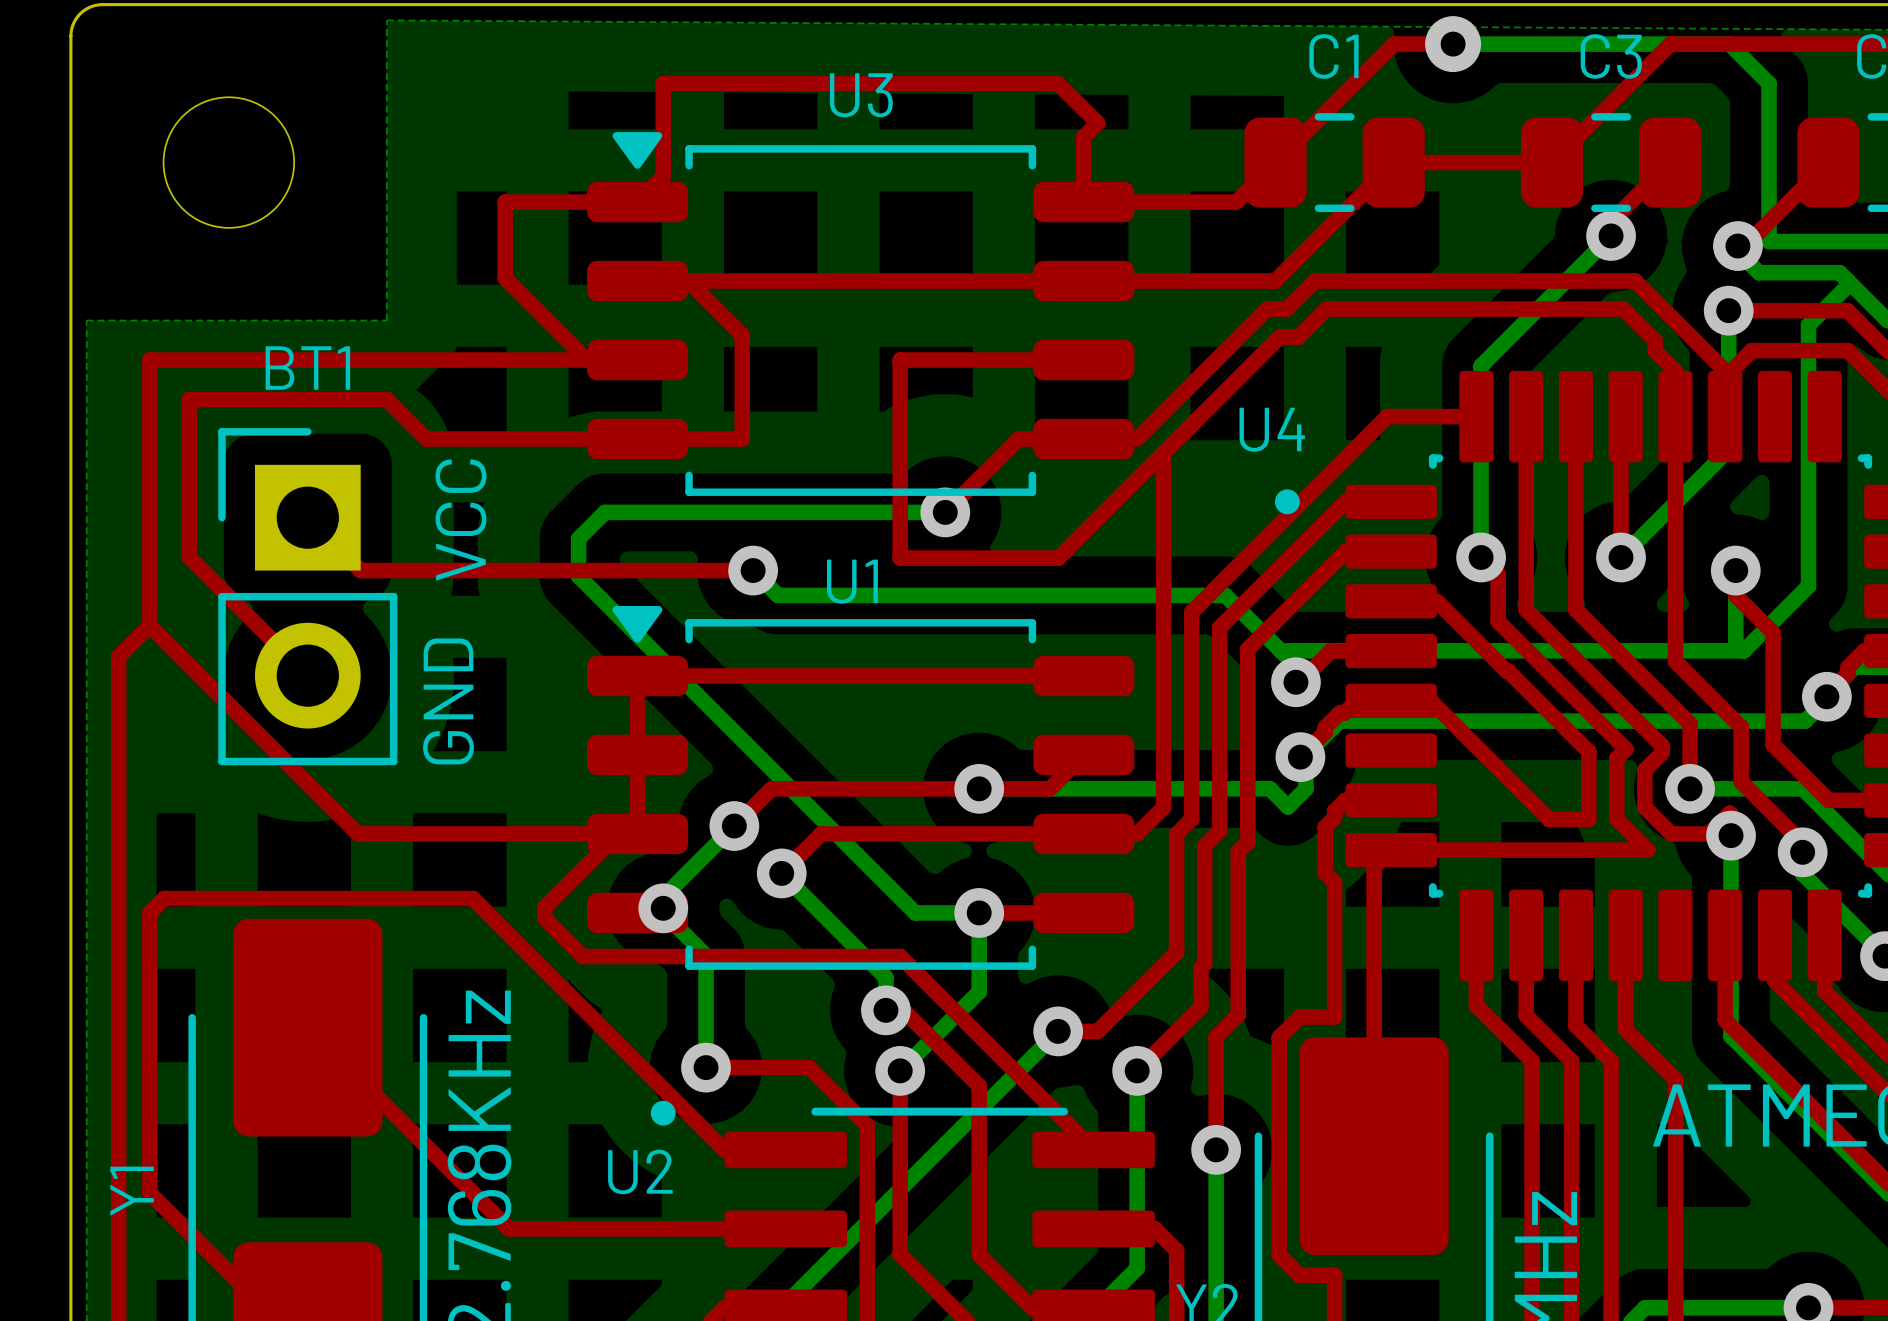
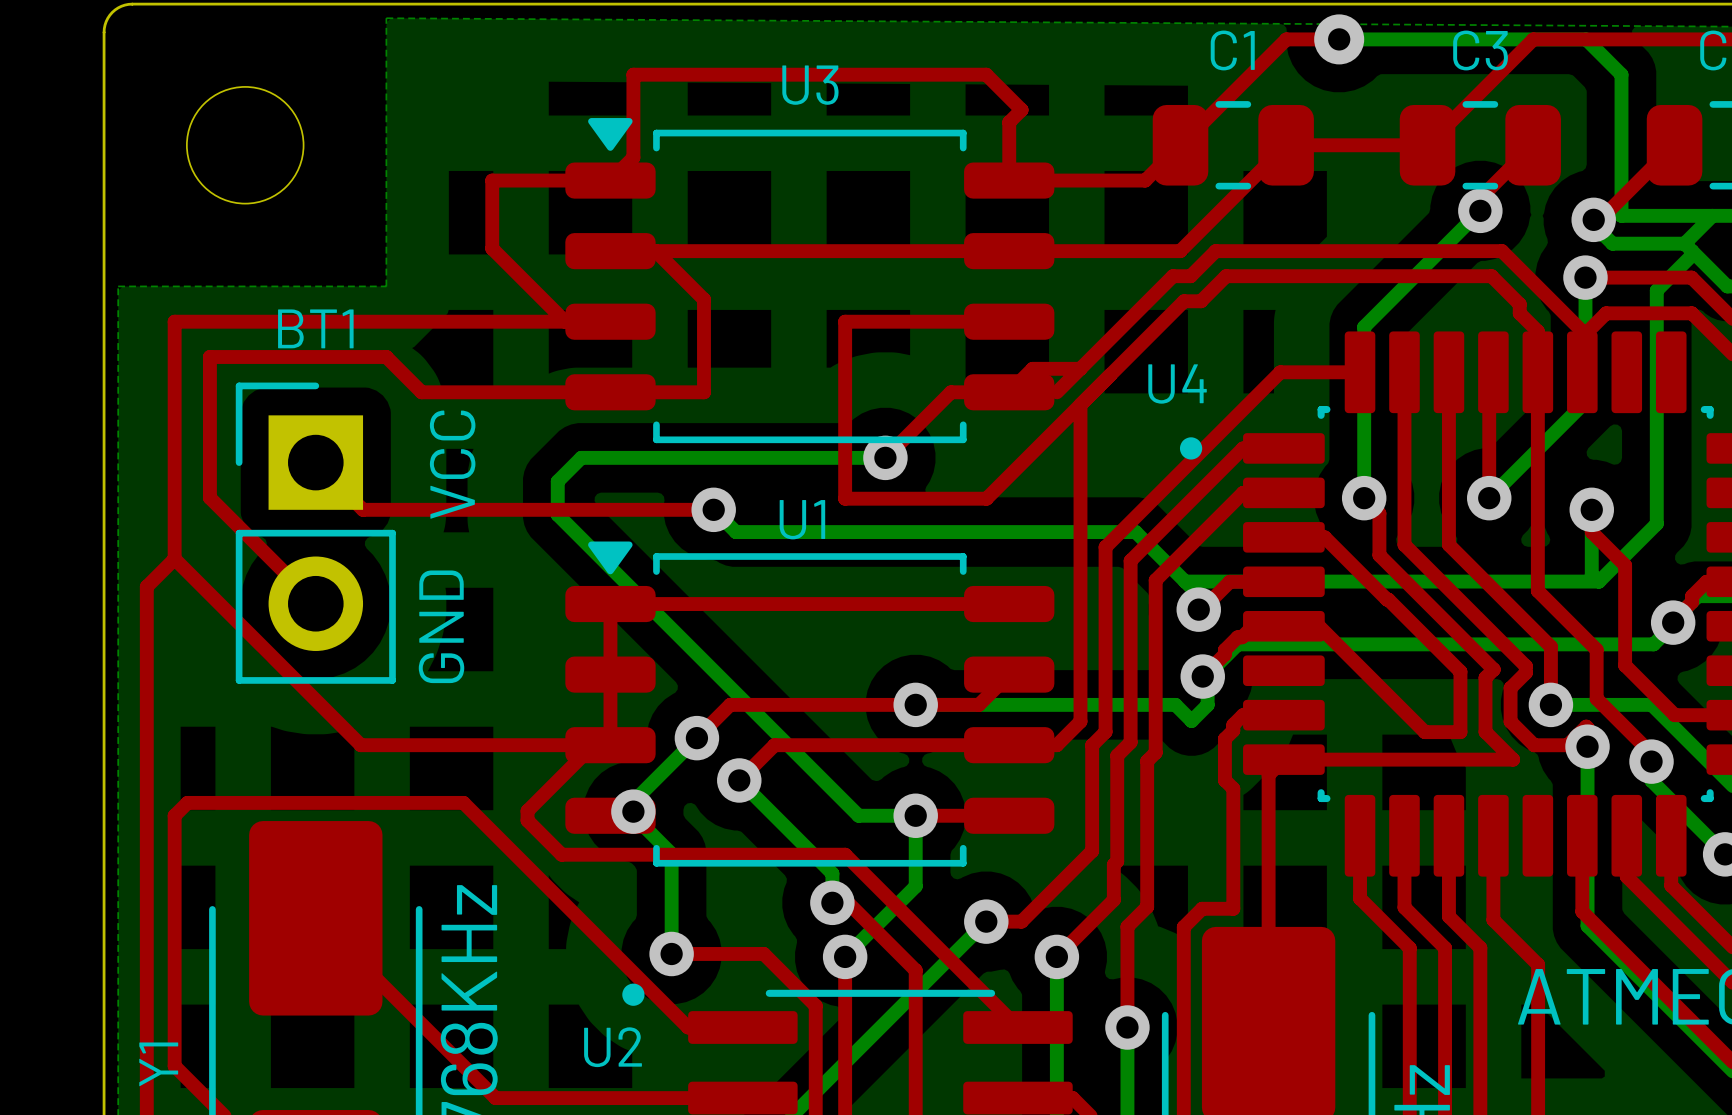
bottom track: none -> (1712, 215) (1684, 243)
top track: none -> (1080, 368) (1032, 368) (1009, 392)

